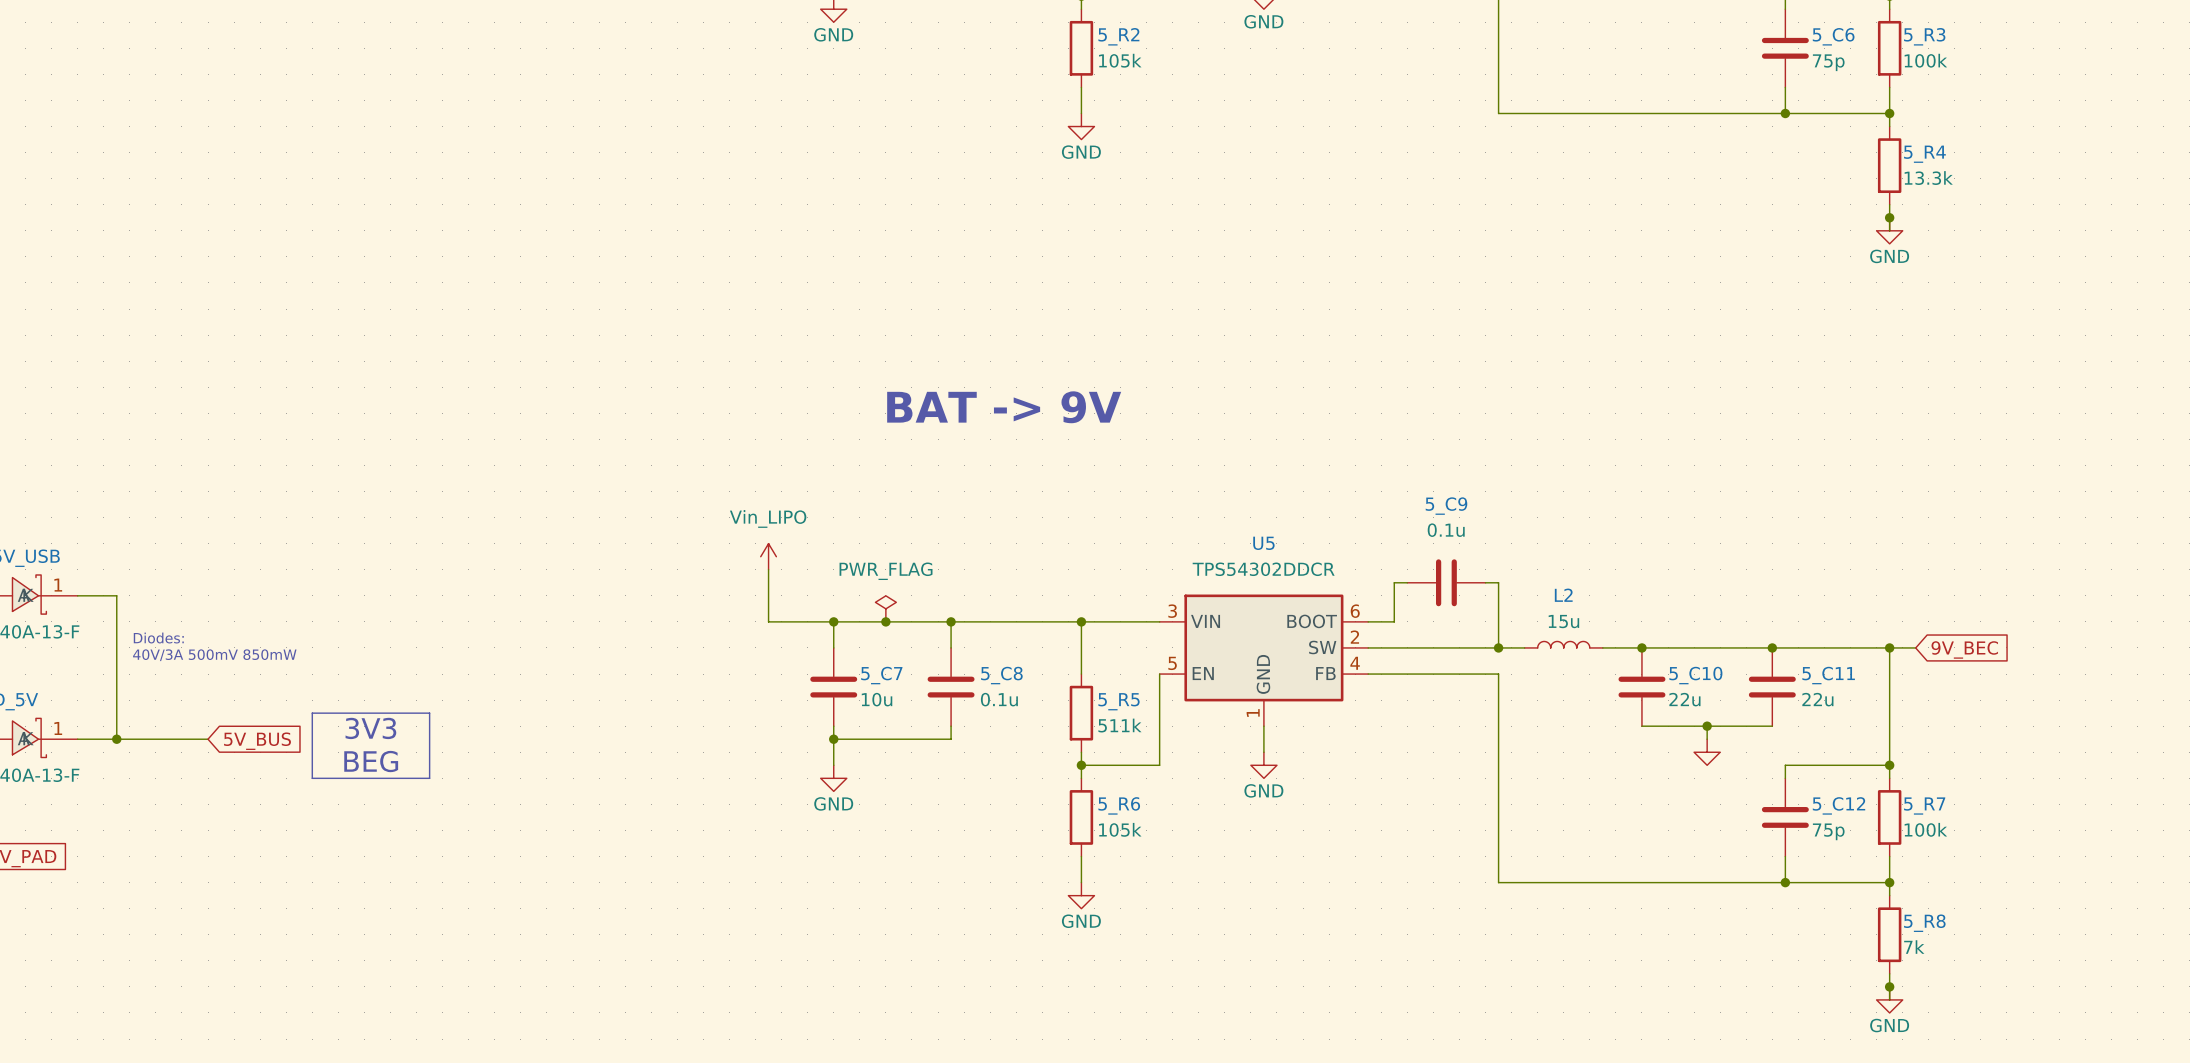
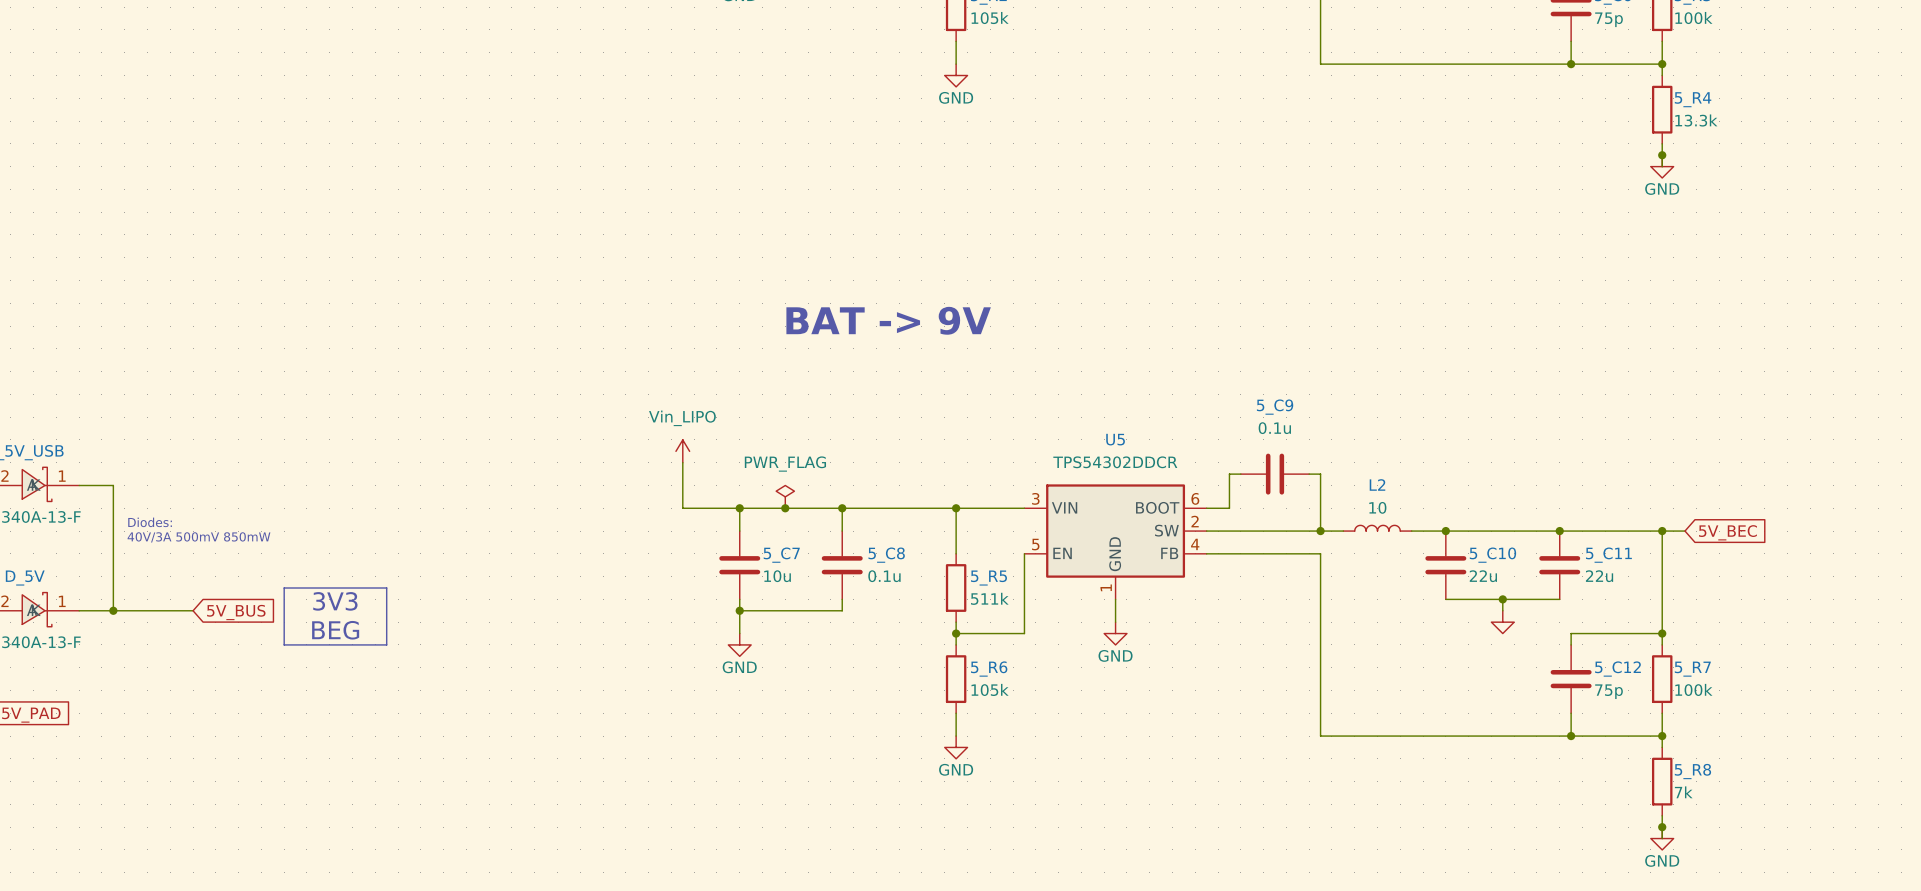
L2 value: 15u (1563, 621) -> 10 (1377, 507)
global label: 9V_BEC (1964, 649) -> 5V_BEC (1727, 532)

